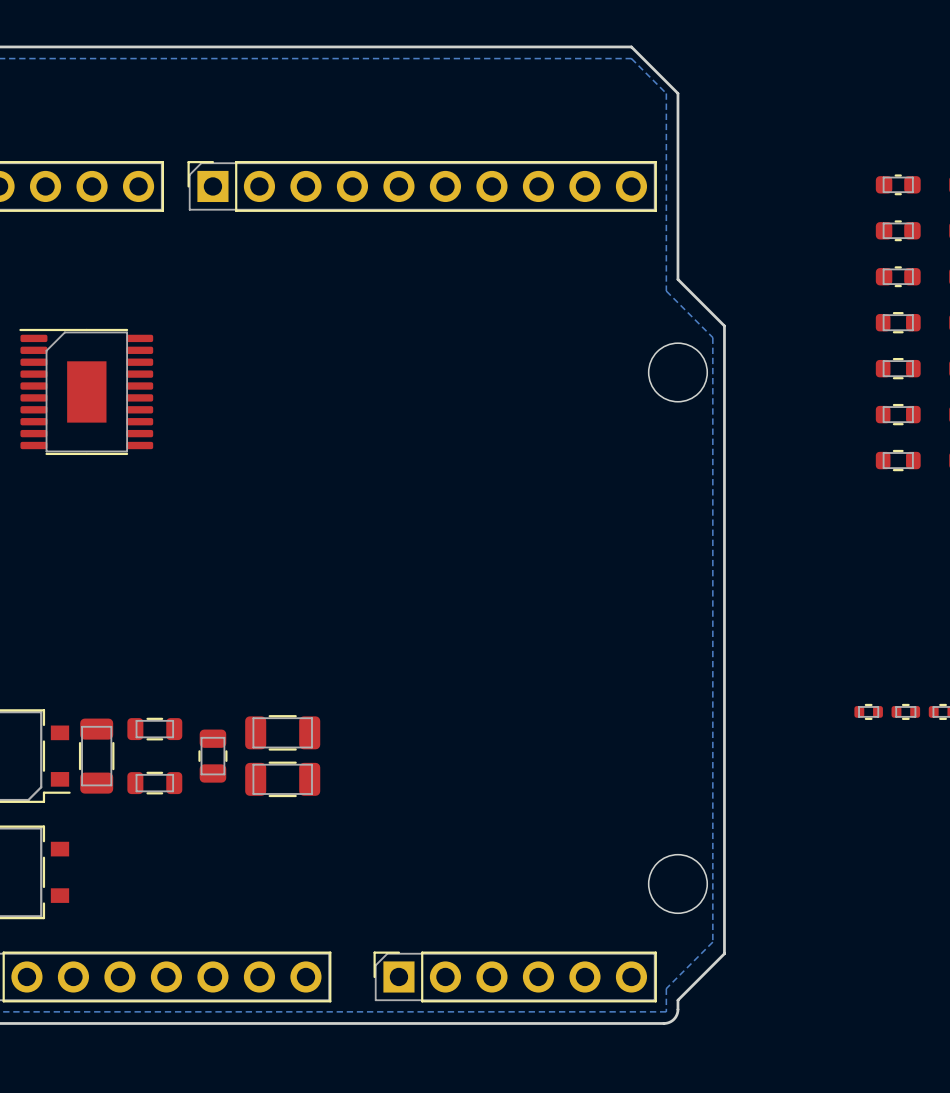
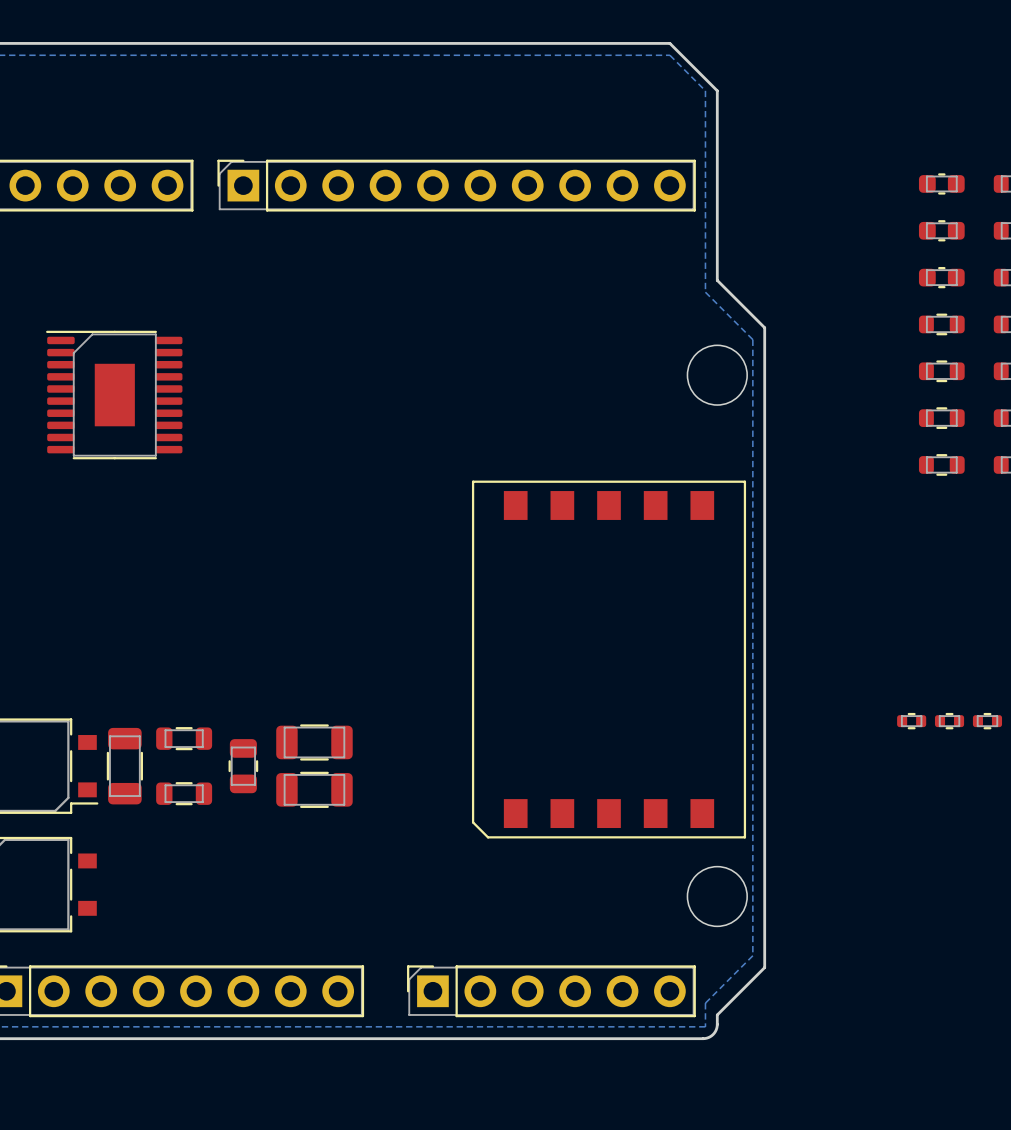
part: none -> (609, 659)

